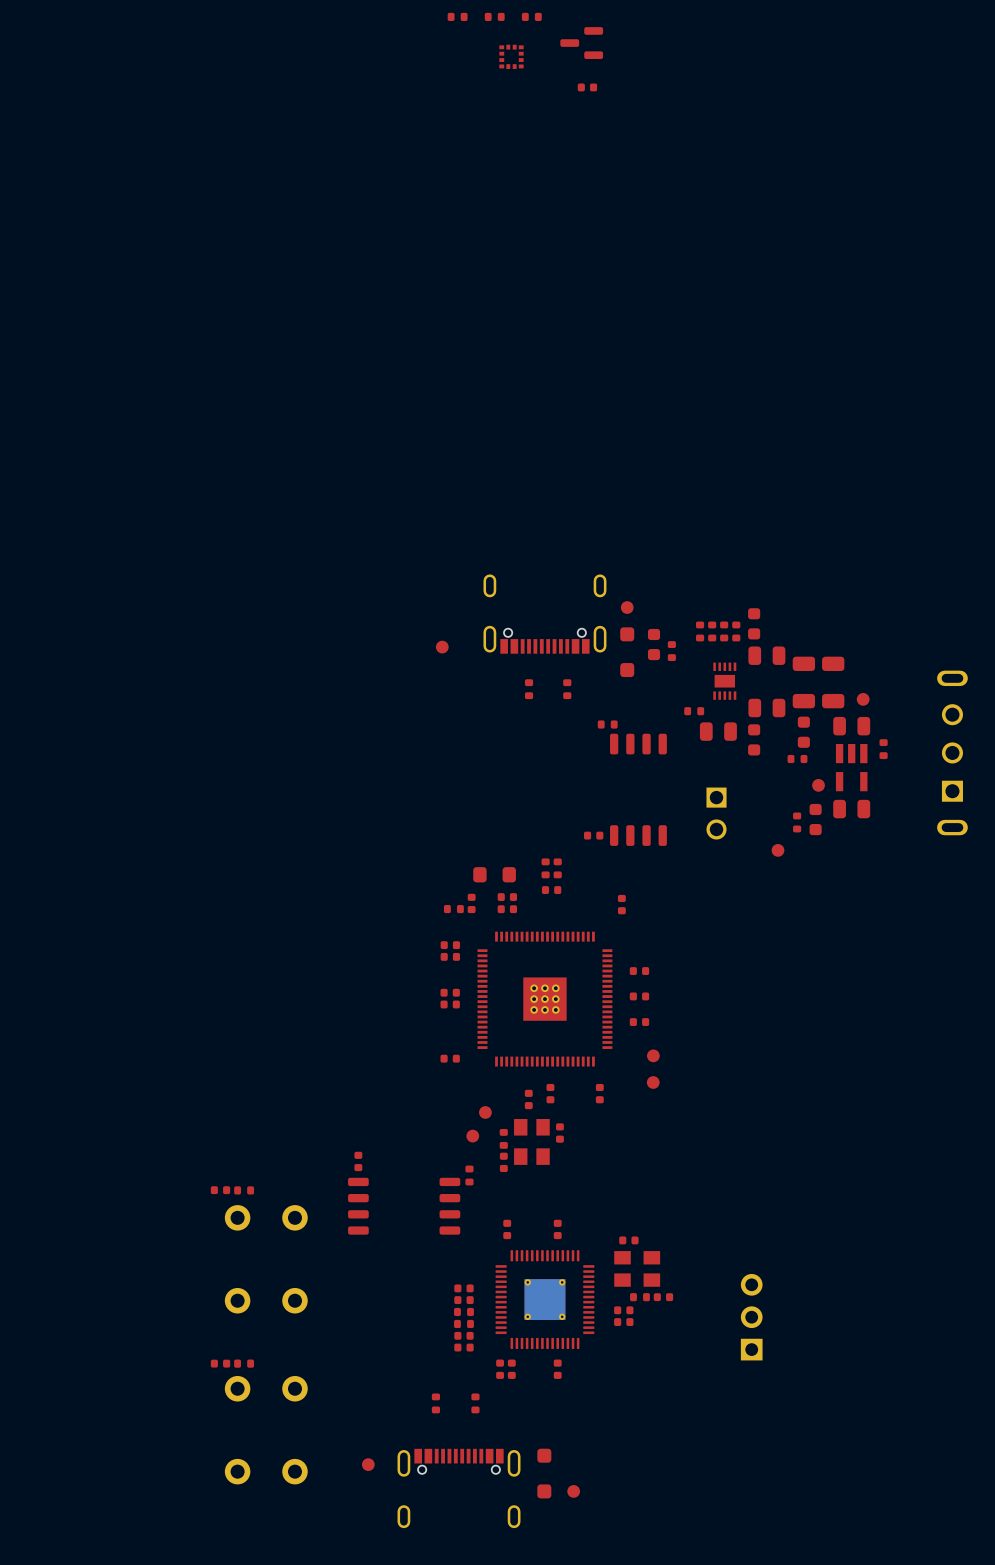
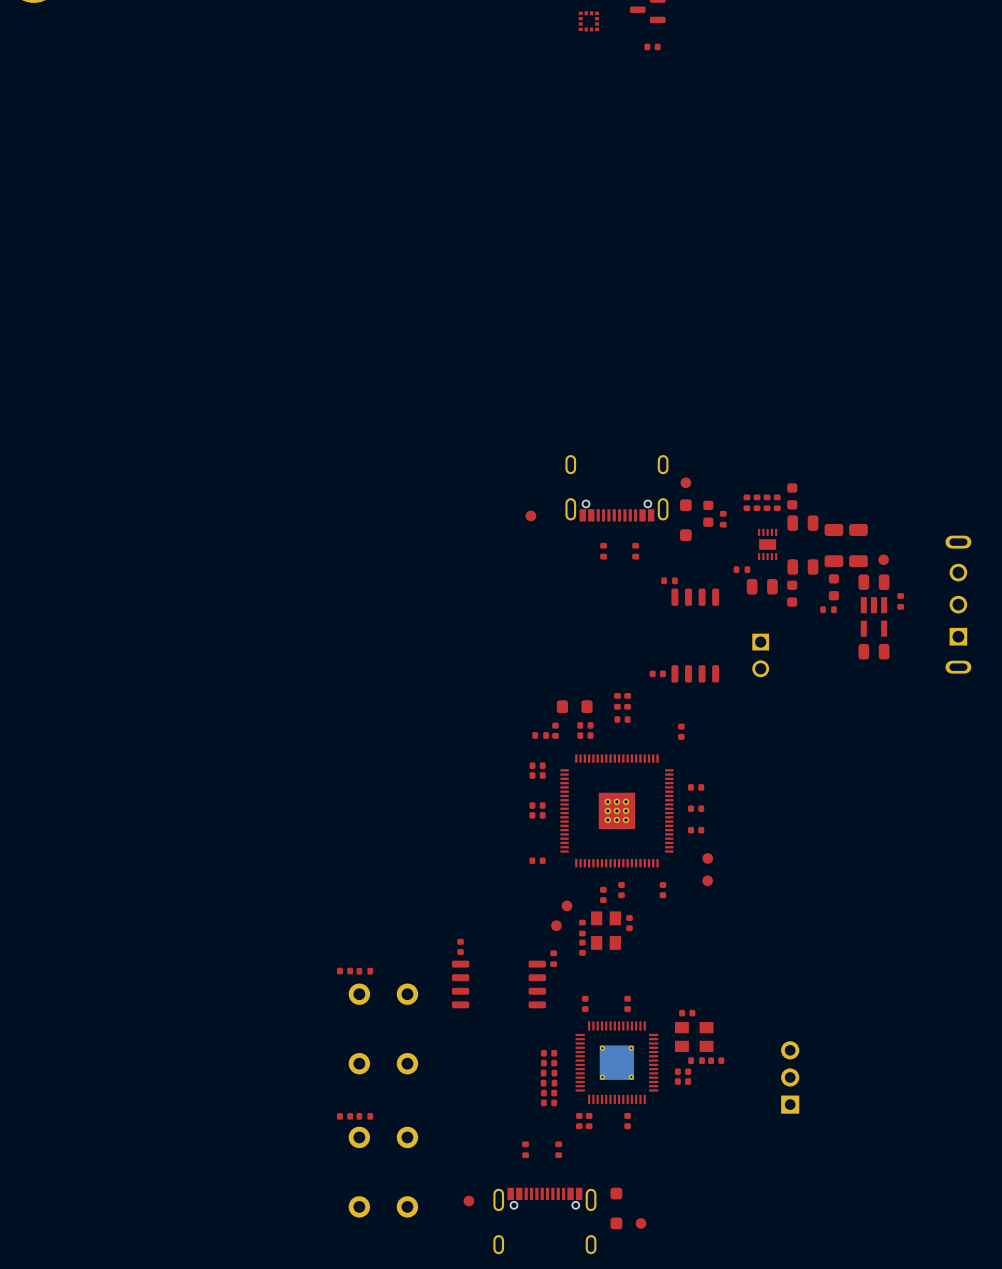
part: (818, 785) -> none
part: (815, 819) -> none
part: (797, 822) -> none
part: (777, 850) -> none

